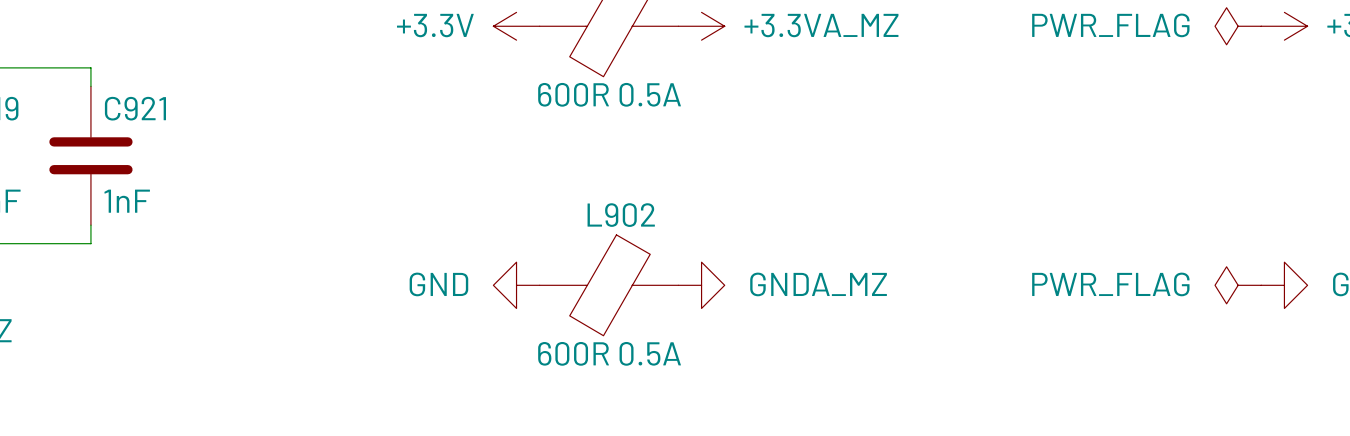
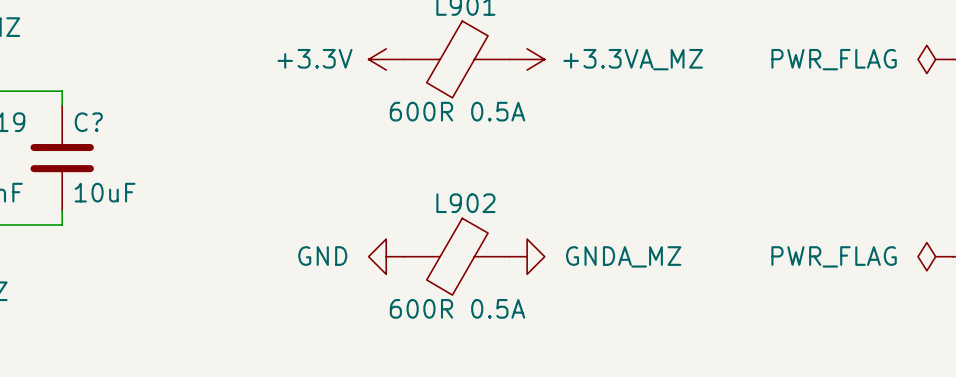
C921 name: C921 (135, 108) -> C? (88, 122)
C921 value: 1nF (127, 201) -> 10uF (105, 192)

